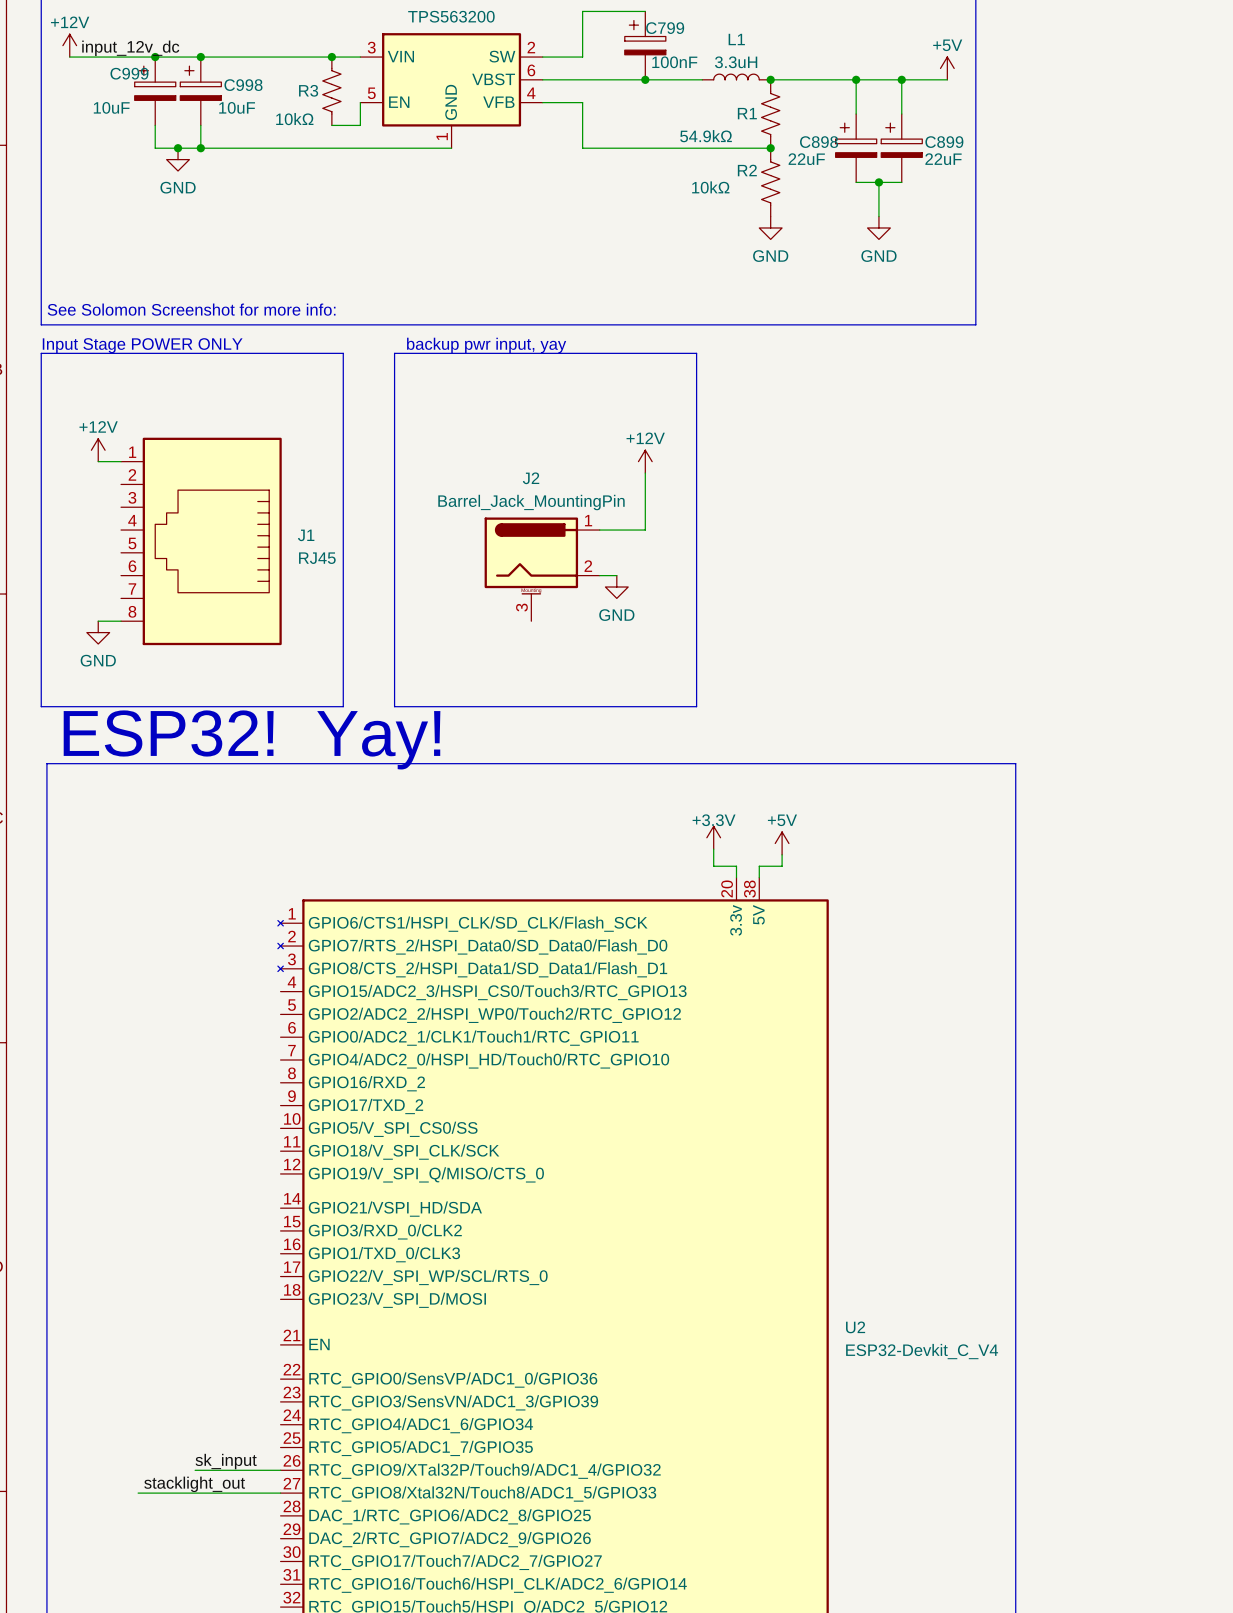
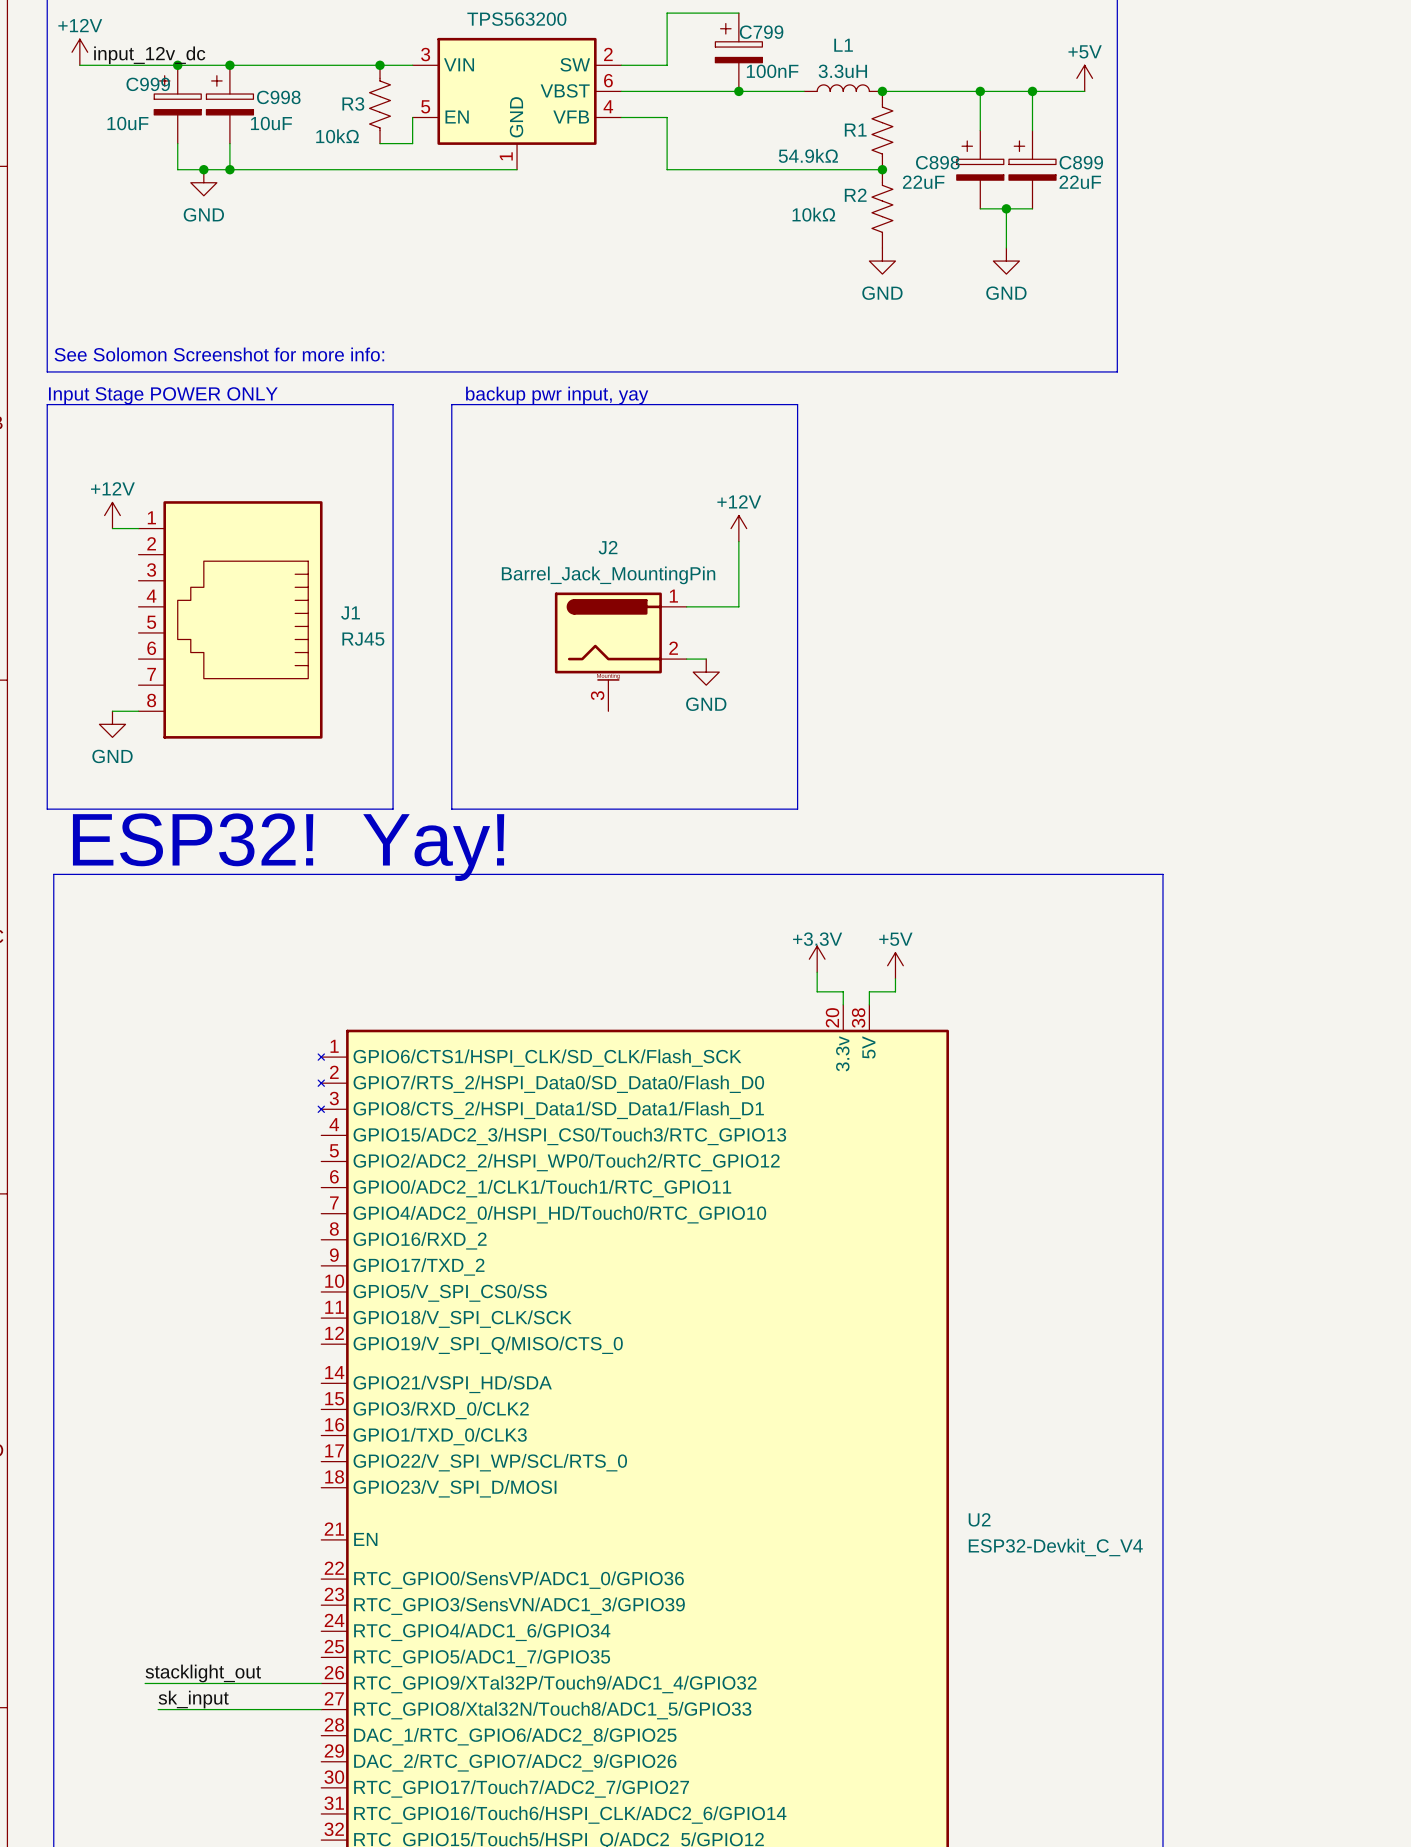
label: none -> stacklight_out (203, 1673)
label: sk_input (226, 1461) -> none
wire: none -> (145, 1683) (223, 1683)
label: stacklight_out (194, 1484) -> sk_input (193, 1699)

